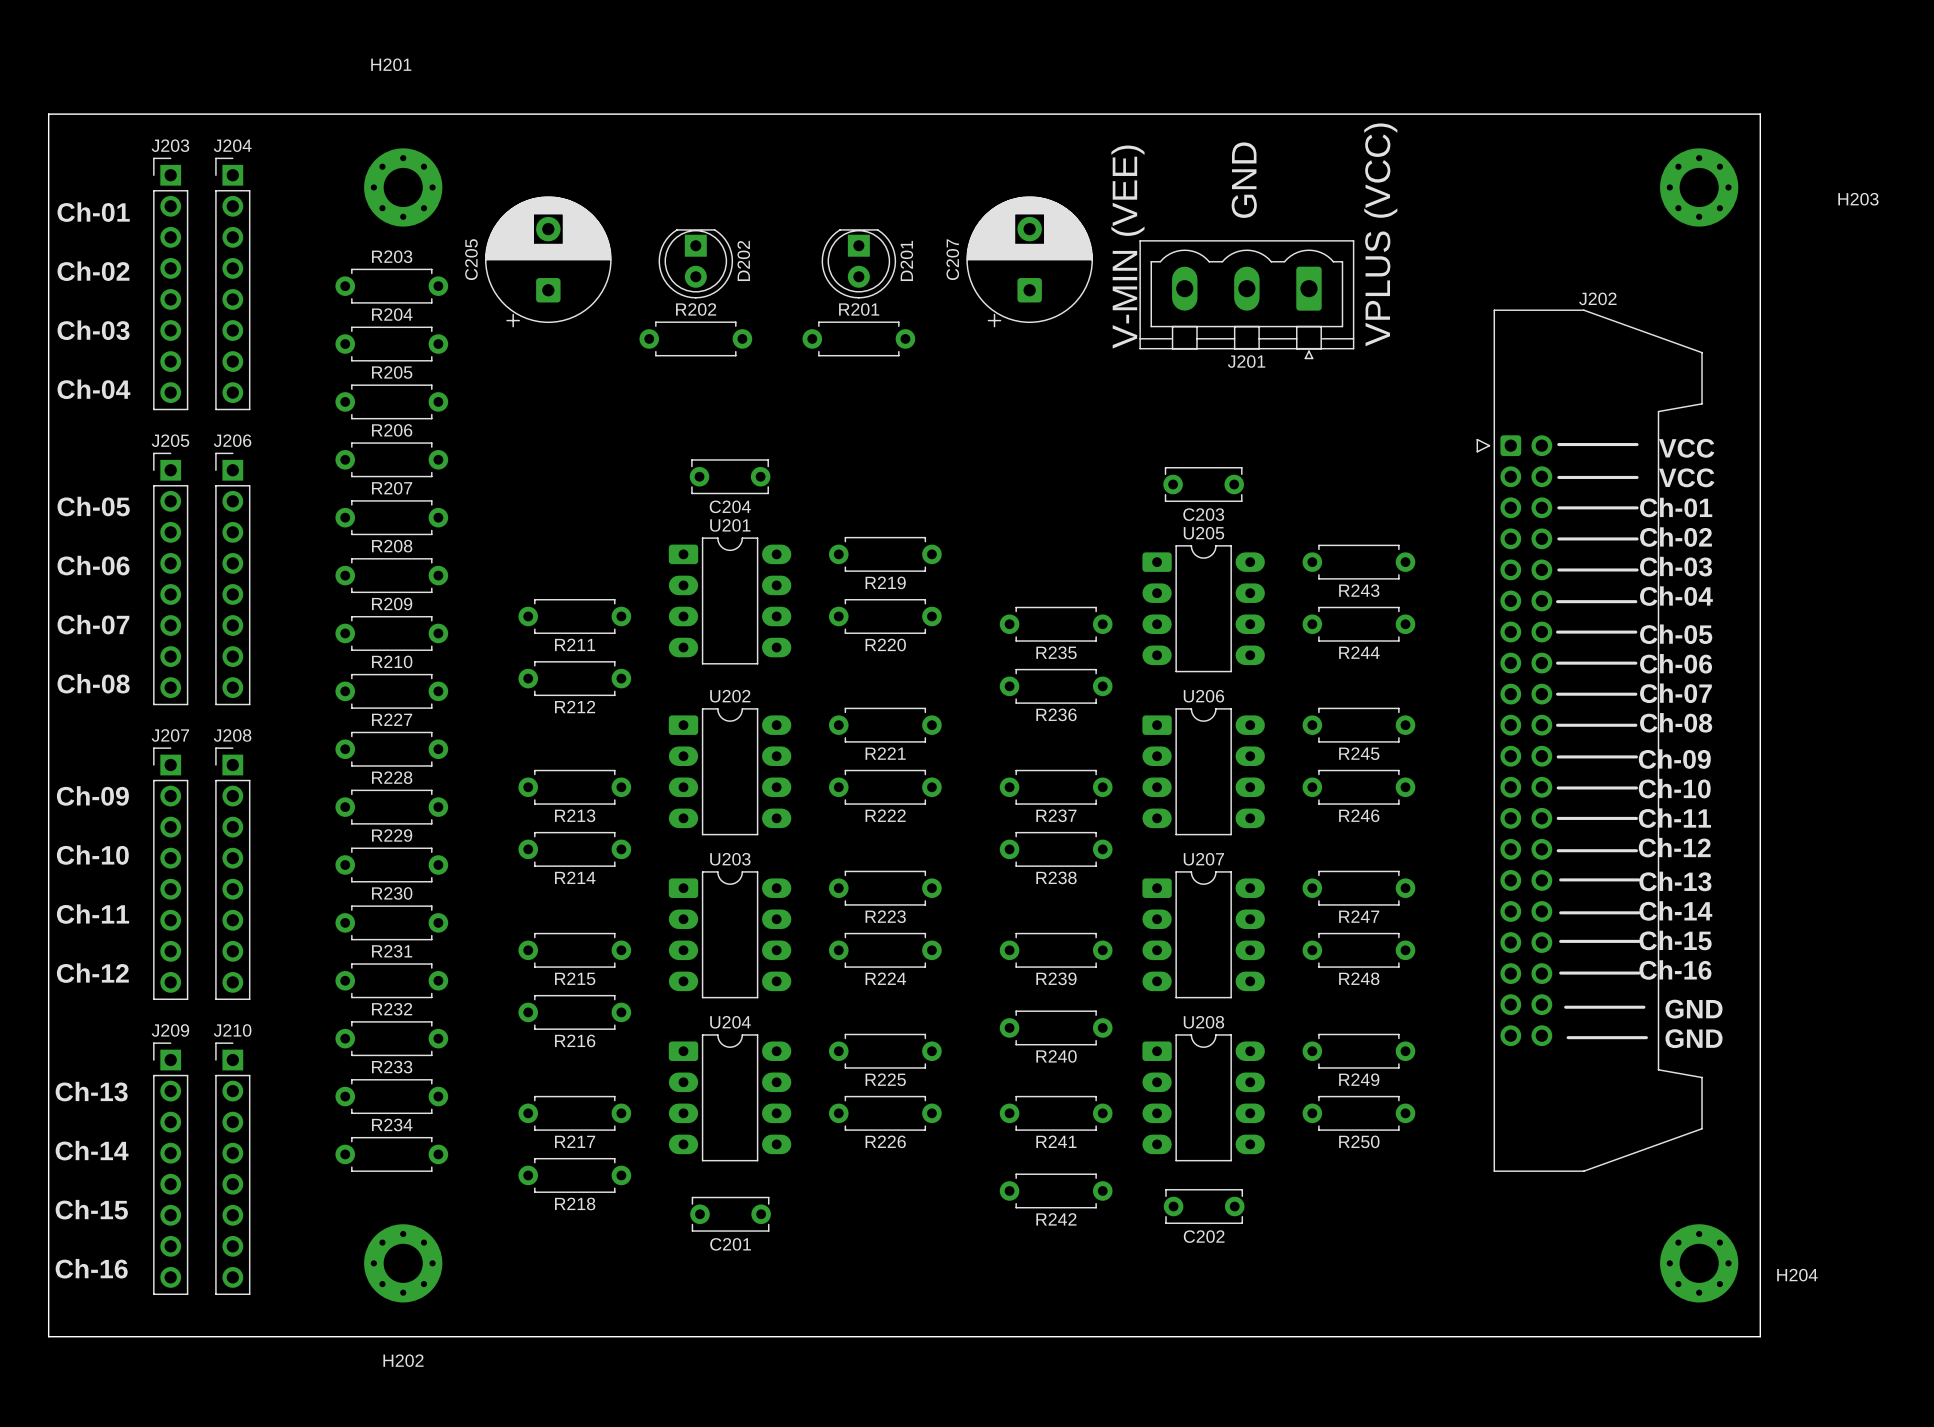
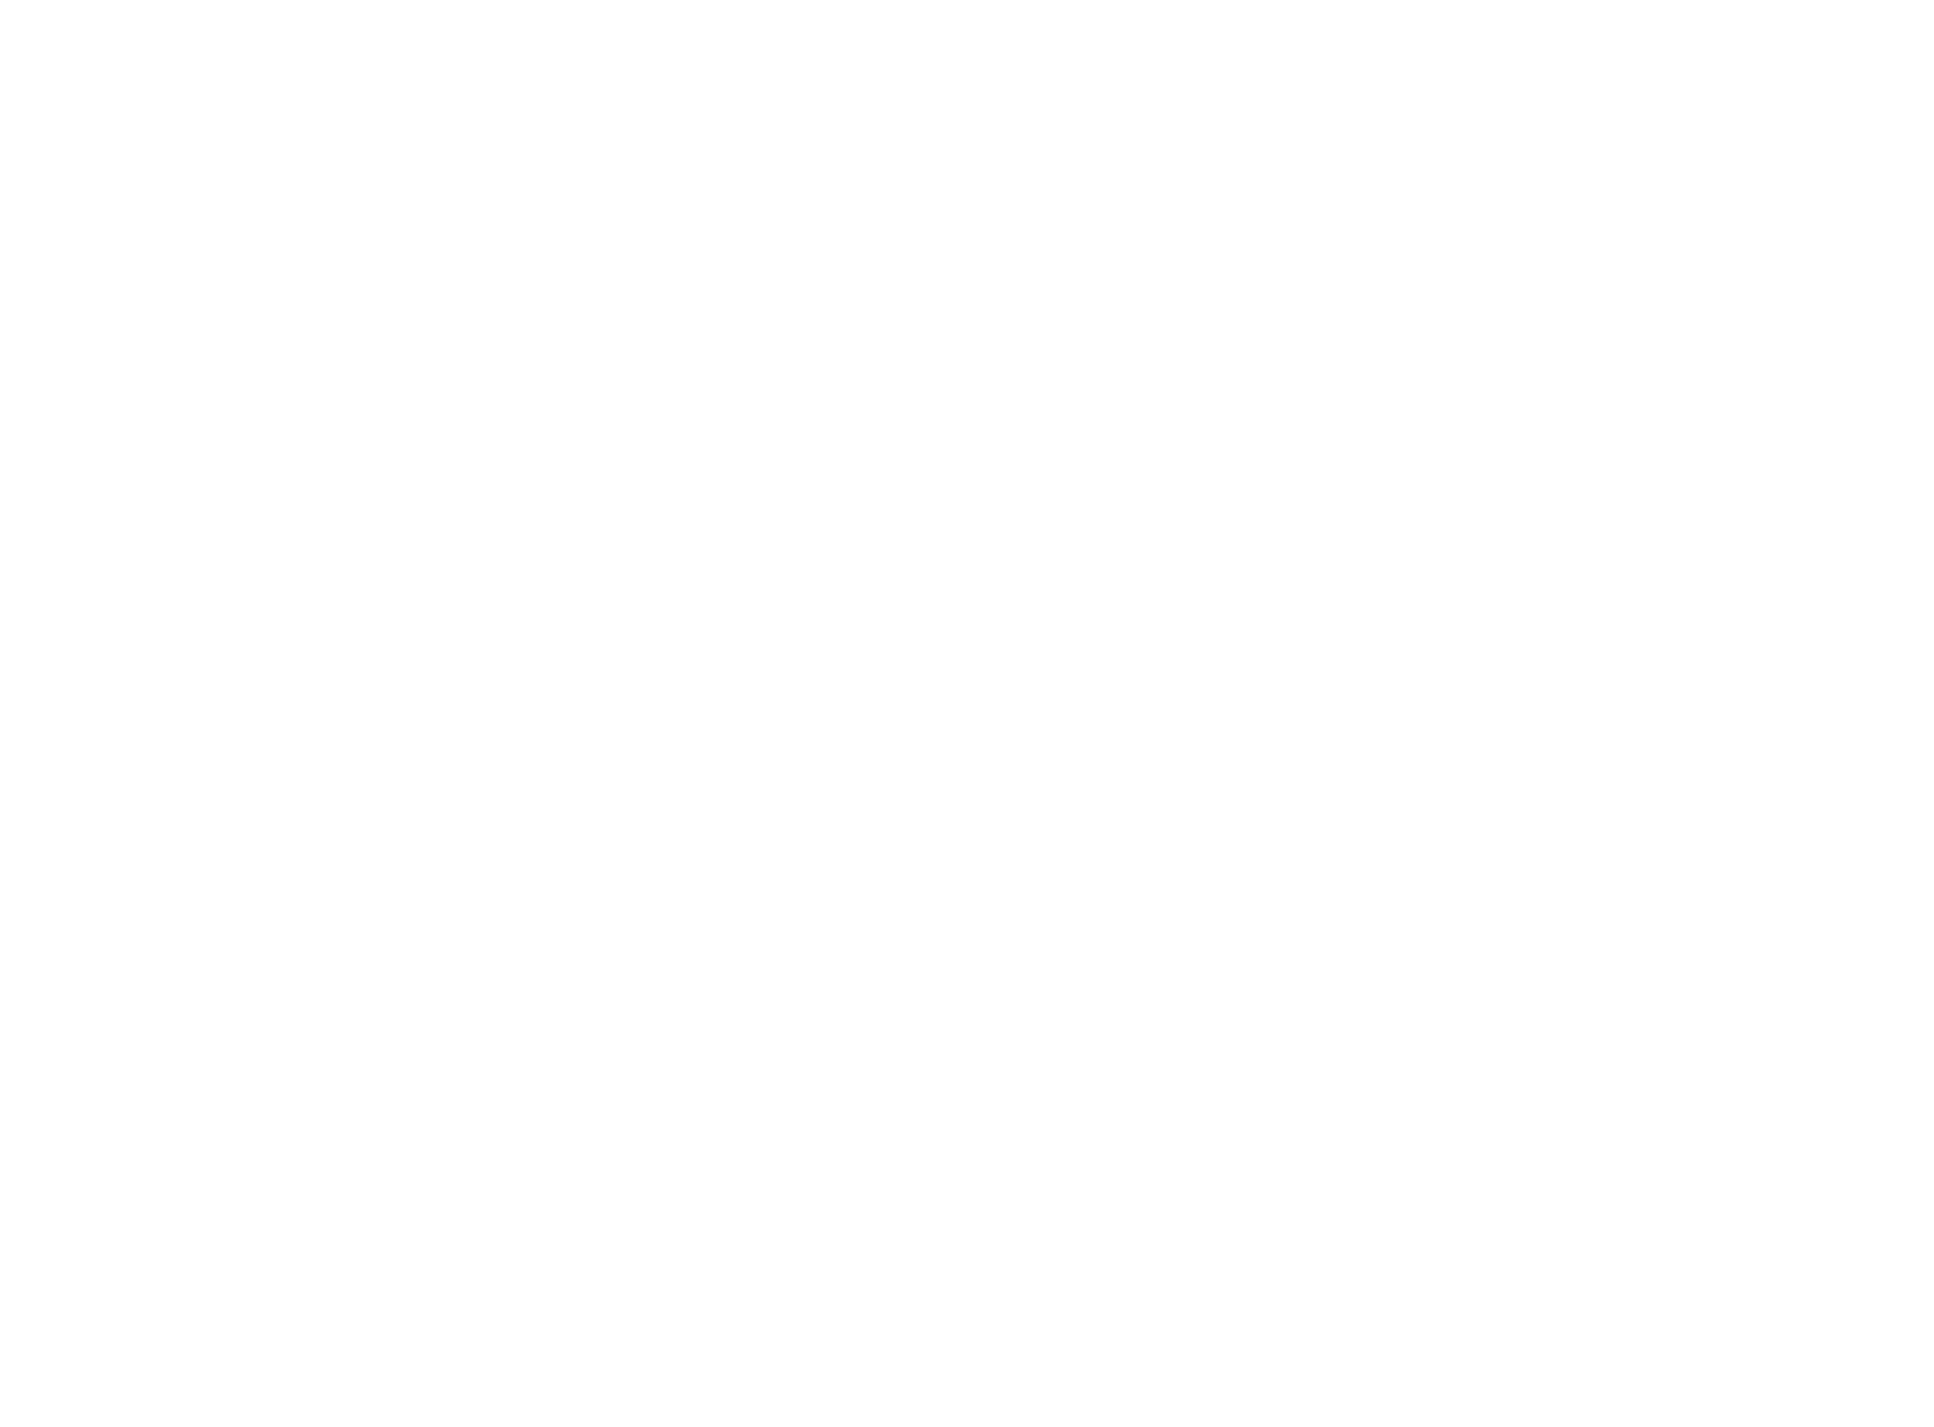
board edge: (48, 114) (1760, 114) (1760, 1336) (48, 1336) (48, 114) -> none
text: GND (1244, 180) -> none
H201: (403, 187) -> none
H203: (1699, 187) -> none
text: Ch-01 (93, 212) -> none
text: VPLUS (VCC) (1380, 234) -> none
text: V-MIN (VEE) (1127, 247) -> none
C205: (548, 261) -> none
C207: (1029, 261) -> none
D202: (695, 263) -> none
D201: (858, 263) -> none
text: Ch-02 (93, 271) -> none
J203: (170, 283) -> none
J204: (232, 283) -> none
R203: (391, 286) -> none
J201: (1246, 299) -> none
text: Ch-03 (93, 330) -> none
R202: (695, 338) -> none
R201: (858, 338) -> none
R204: (391, 344) -> none
text: Ch-04 (93, 389) -> none
R205: (391, 401) -> none
line: (1558, 444) (1637, 444) -> none
text: VCC (1686, 448) -> none
R206: (391, 459) -> none
C204: (730, 476) -> none
line: (1558, 477) (1637, 477) -> none
text: VCC (1686, 477) -> none
C203: (1203, 484) -> none
text: Ch-05 (93, 506) -> none
line: (1558, 507) (1637, 507) -> none
text: Ch-01 (1676, 507) -> none
R207: (391, 517) -> none
text: Ch-02 (1675, 537) -> none
line: (1558, 538) (1637, 538) -> none
R219: (885, 554) -> none
R243: (1358, 562) -> none
text: Ch-06 (93, 565) -> none
text: Ch-03 (1676, 566) -> none
line: (1558, 569) (1637, 569) -> none
R208: (391, 575) -> none
J205: (170, 578) -> none
J206: (232, 578) -> none
text: Ch-04 (1676, 596) -> none
U201: (730, 600) -> none
line: (1557, 601) (1635, 601) -> none
U205: (1203, 608) -> none
R211: (574, 616) -> none
R220: (885, 616) -> none
text: Ch-07 (93, 624) -> none
R235: (1056, 624) -> none
R244: (1358, 624) -> none
line: (1557, 632) (1635, 632) -> none
R209: (391, 633) -> none
text: Ch-05 (1676, 634) -> none
line: (1557, 663) (1635, 663) -> none
text: Ch-06 (1676, 663) -> none
R212: (574, 678) -> none
text: Ch-08 (93, 683) -> none
R236: (1056, 686) -> none
R210: (391, 691) -> none
text: Ch-07 (1675, 693) -> none
line: (1557, 694) (1635, 694) -> none
text: Ch-08 (1676, 722) -> none
R221: (885, 725) -> none
R245: (1358, 725) -> none
line: (1557, 725) (1635, 725) -> none
J202: (1589, 740) -> none
R227: (391, 749) -> none
line: (1558, 756) (1636, 756) -> none
text: Ch-09 (1674, 759) -> none
U202: (730, 771) -> none
U206: (1203, 771) -> none
R213: (574, 787) -> none
R222: (885, 787) -> none
R237: (1056, 787) -> none
R246: (1358, 787) -> none
line: (1558, 787) (1636, 787) -> none
text: Ch-10 (1674, 788) -> none
text: Ch-09 (92, 795) -> none
R228: (391, 807) -> none
line: (1558, 818) (1636, 818) -> none
text: Ch-11 (1674, 818) -> none
text: Ch-12 (1674, 847) -> none
R214: (574, 849) -> none
R238: (1056, 849) -> none
line: (1558, 850) (1636, 850) -> none
text: Ch-10 (92, 854) -> none
R229: (391, 865) -> none
J207: (170, 873) -> none
J208: (232, 873) -> none
line: (1560, 879) (1638, 879) -> none
text: Ch-13 (1675, 881) -> none
R223: (885, 888) -> none
R247: (1358, 888) -> none
text: Ch-14 (1675, 910) -> none
line: (1560, 912) (1638, 912) -> none
text: Ch-11 (93, 914) -> none
R230: (391, 922) -> none
U203: (730, 934) -> none
U207: (1203, 934) -> none
text: Ch-15 (1675, 940) -> none
line: (1560, 941) (1638, 941) -> none
R215: (574, 950) -> none
R224: (885, 950) -> none
R239: (1056, 950) -> none
R248: (1358, 950) -> none
text: Ch-16 (1675, 969) -> none
text: Ch-12 (92, 973) -> none
line: (1560, 973) (1638, 973) -> none
R231: (391, 980) -> none
line: (1565, 1007) (1643, 1007) -> none
text: GND (1694, 1009) -> none
R216: (574, 1012) -> none
R240: (1056, 1027) -> none
line: (1568, 1037) (1646, 1037) -> none
R232: (391, 1038) -> none
text: GND (1694, 1038) -> none
R225: (885, 1051) -> none
R249: (1358, 1051) -> none
text: Ch-13 (91, 1091) -> none
R233: (391, 1096) -> none
U204: (730, 1097) -> none
U208: (1203, 1097) -> none
R217: (574, 1113) -> none
R226: (885, 1113) -> none
R241: (1056, 1113) -> none
R250: (1358, 1113) -> none
text: Ch-14 (92, 1150) -> none
R234: (391, 1154) -> none
J209: (170, 1168) -> none
J210: (232, 1168) -> none
R218: (574, 1175) -> none
R242: (1056, 1190) -> none
C202: (1204, 1206) -> none
text: Ch-15 (91, 1209) -> none
C201: (730, 1214) -> none
H202: (403, 1263) -> none
H204: (1699, 1263) -> none
text: Ch-16 (91, 1268) -> none

